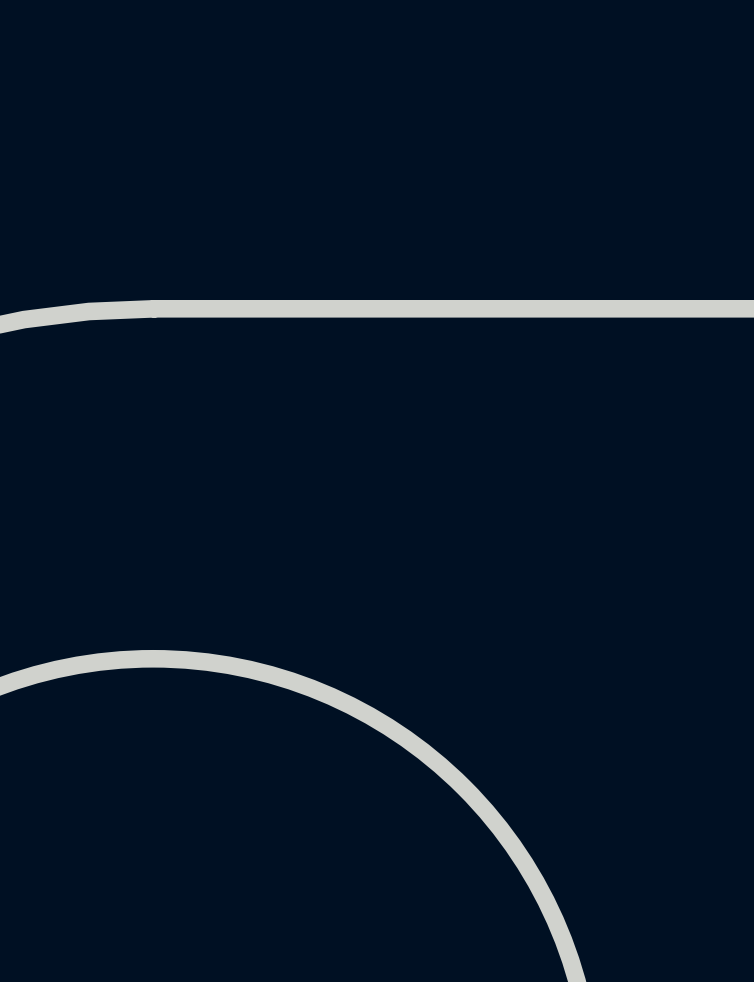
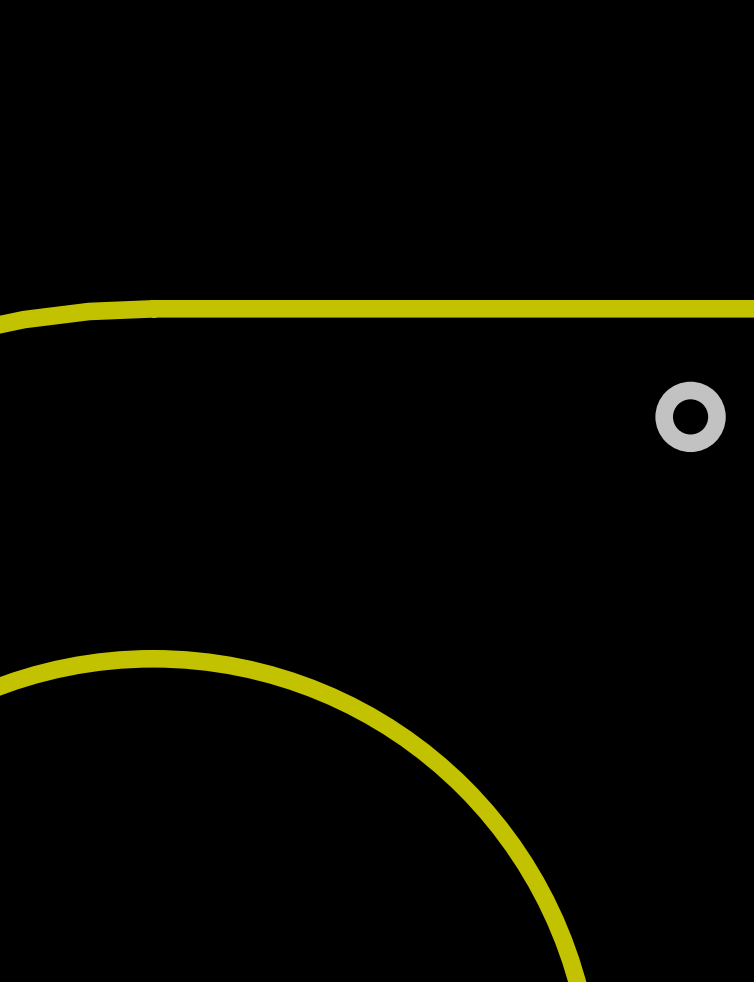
via: none -> (690, 416)

